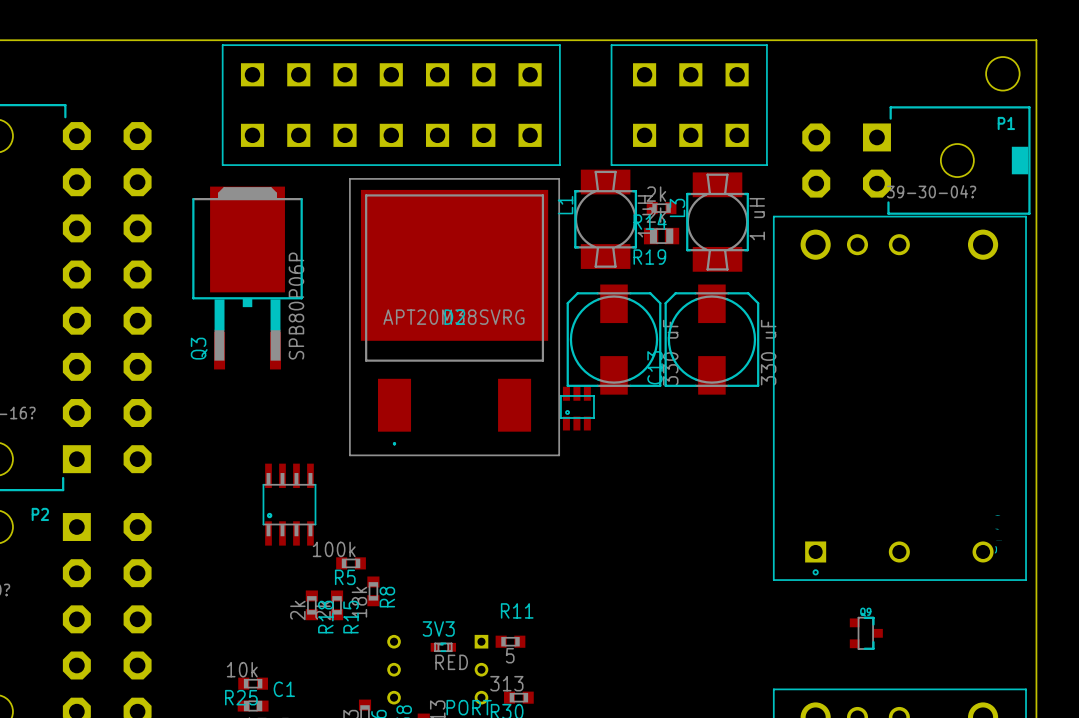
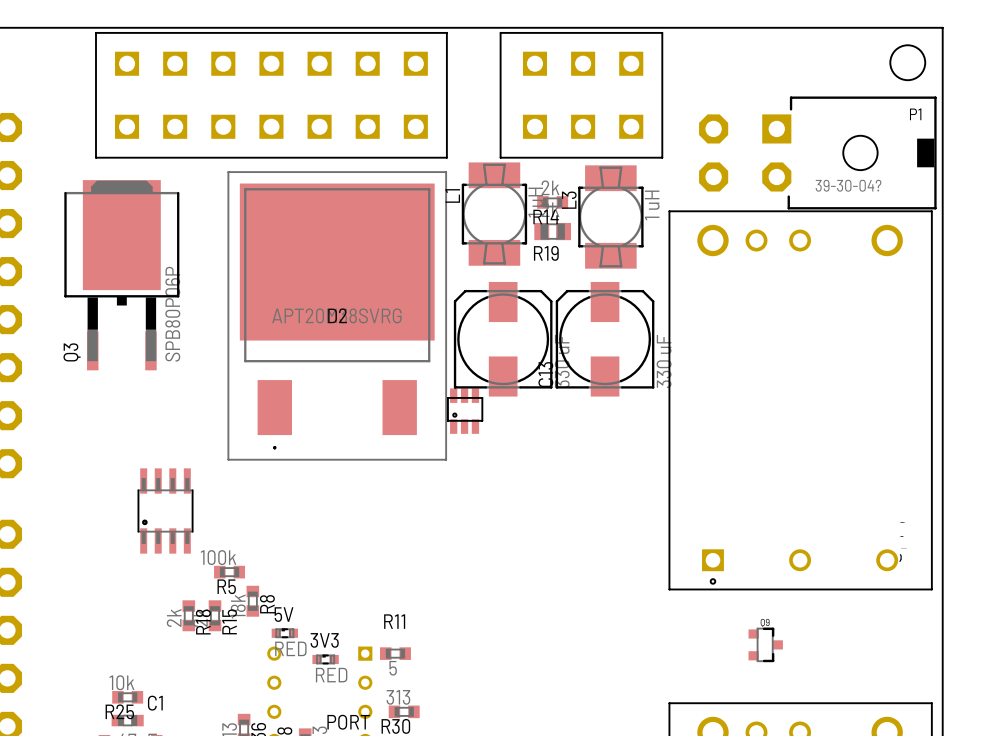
5V: none -> RED (284, 633)

